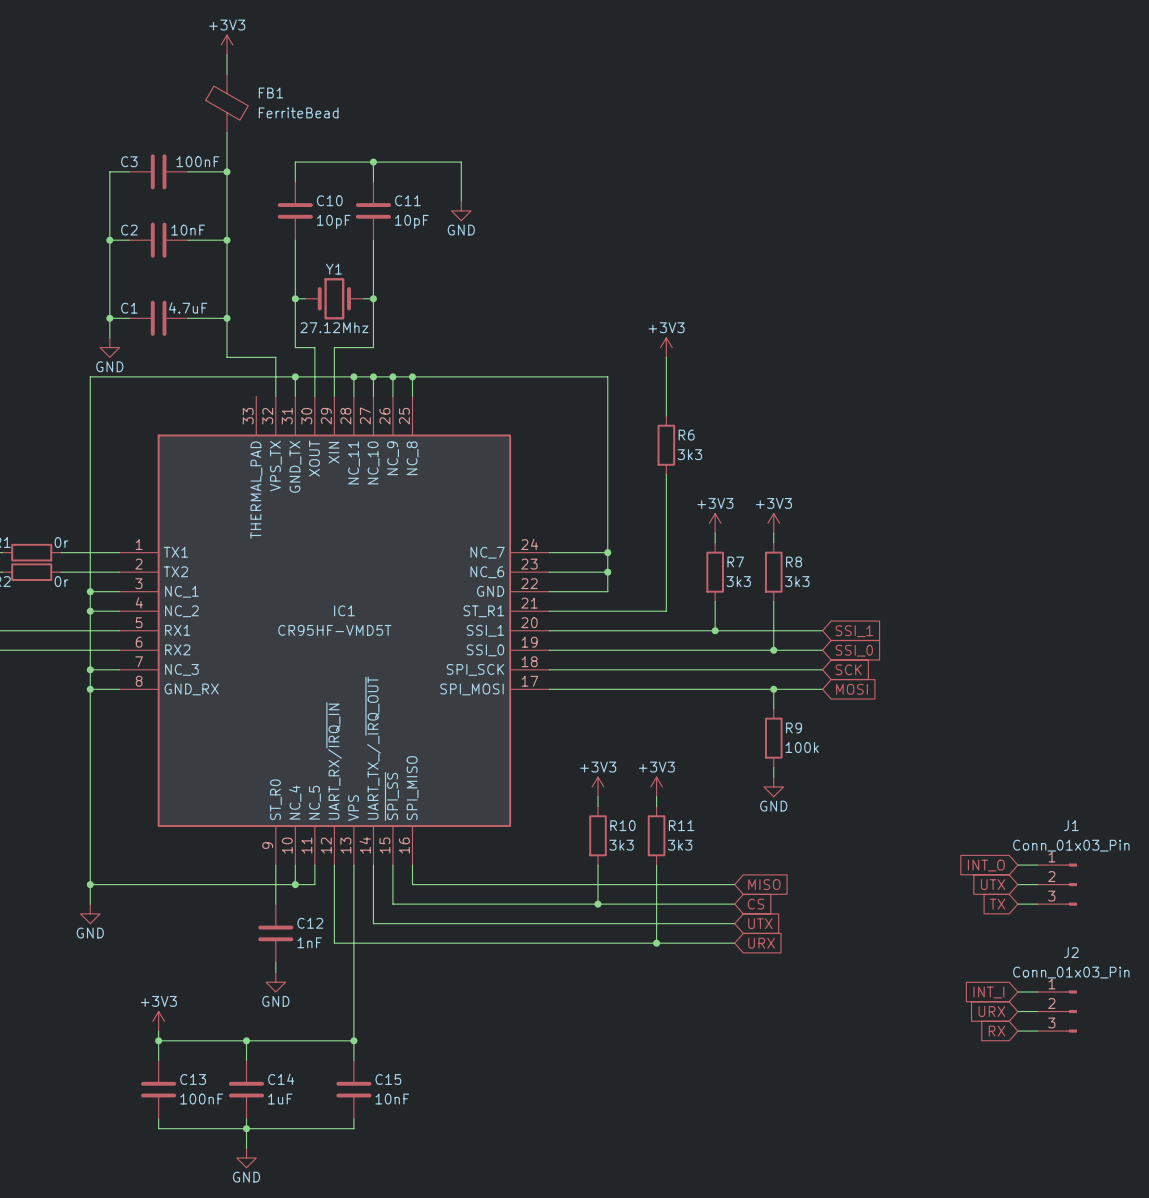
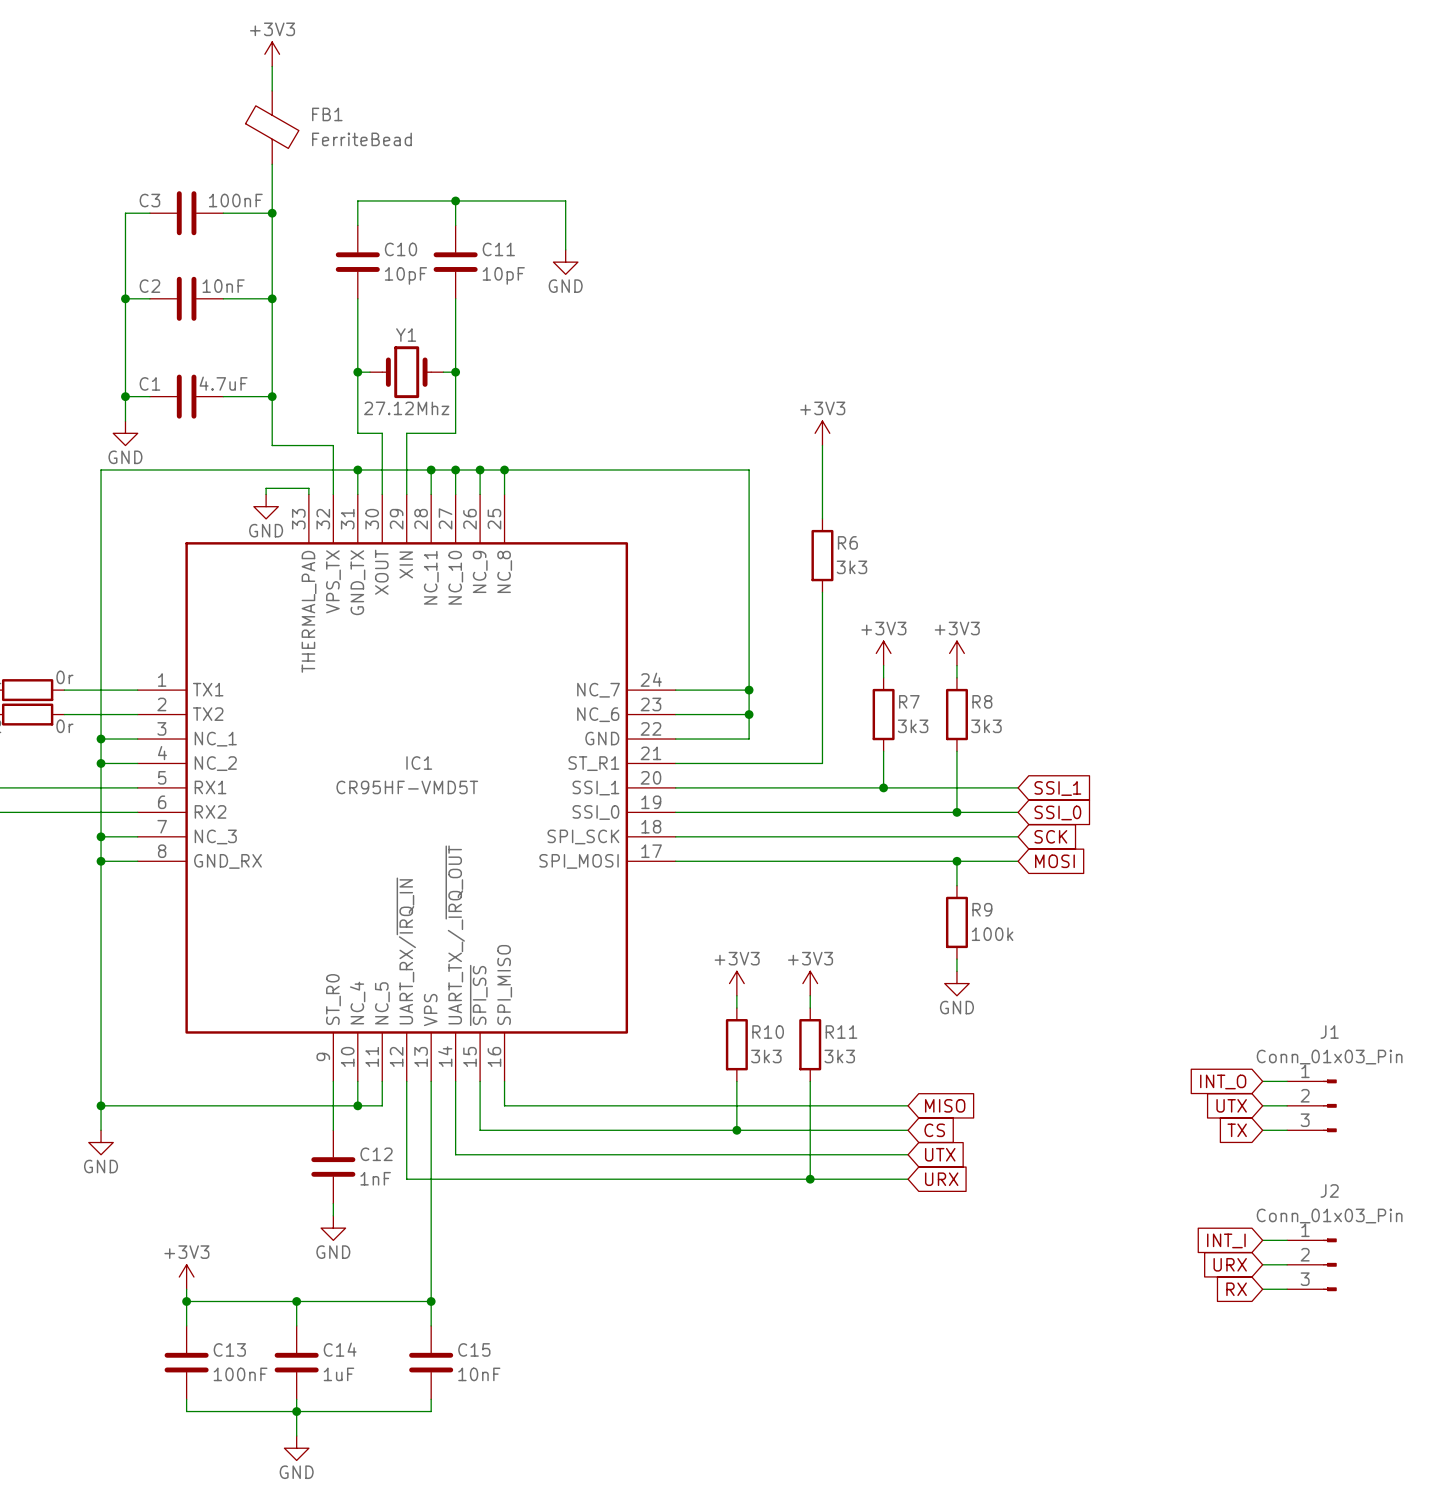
wire: none -> (266, 494) (266, 488) (308, 488) (308, 494)
power symbol: none -> GND (266, 506)

